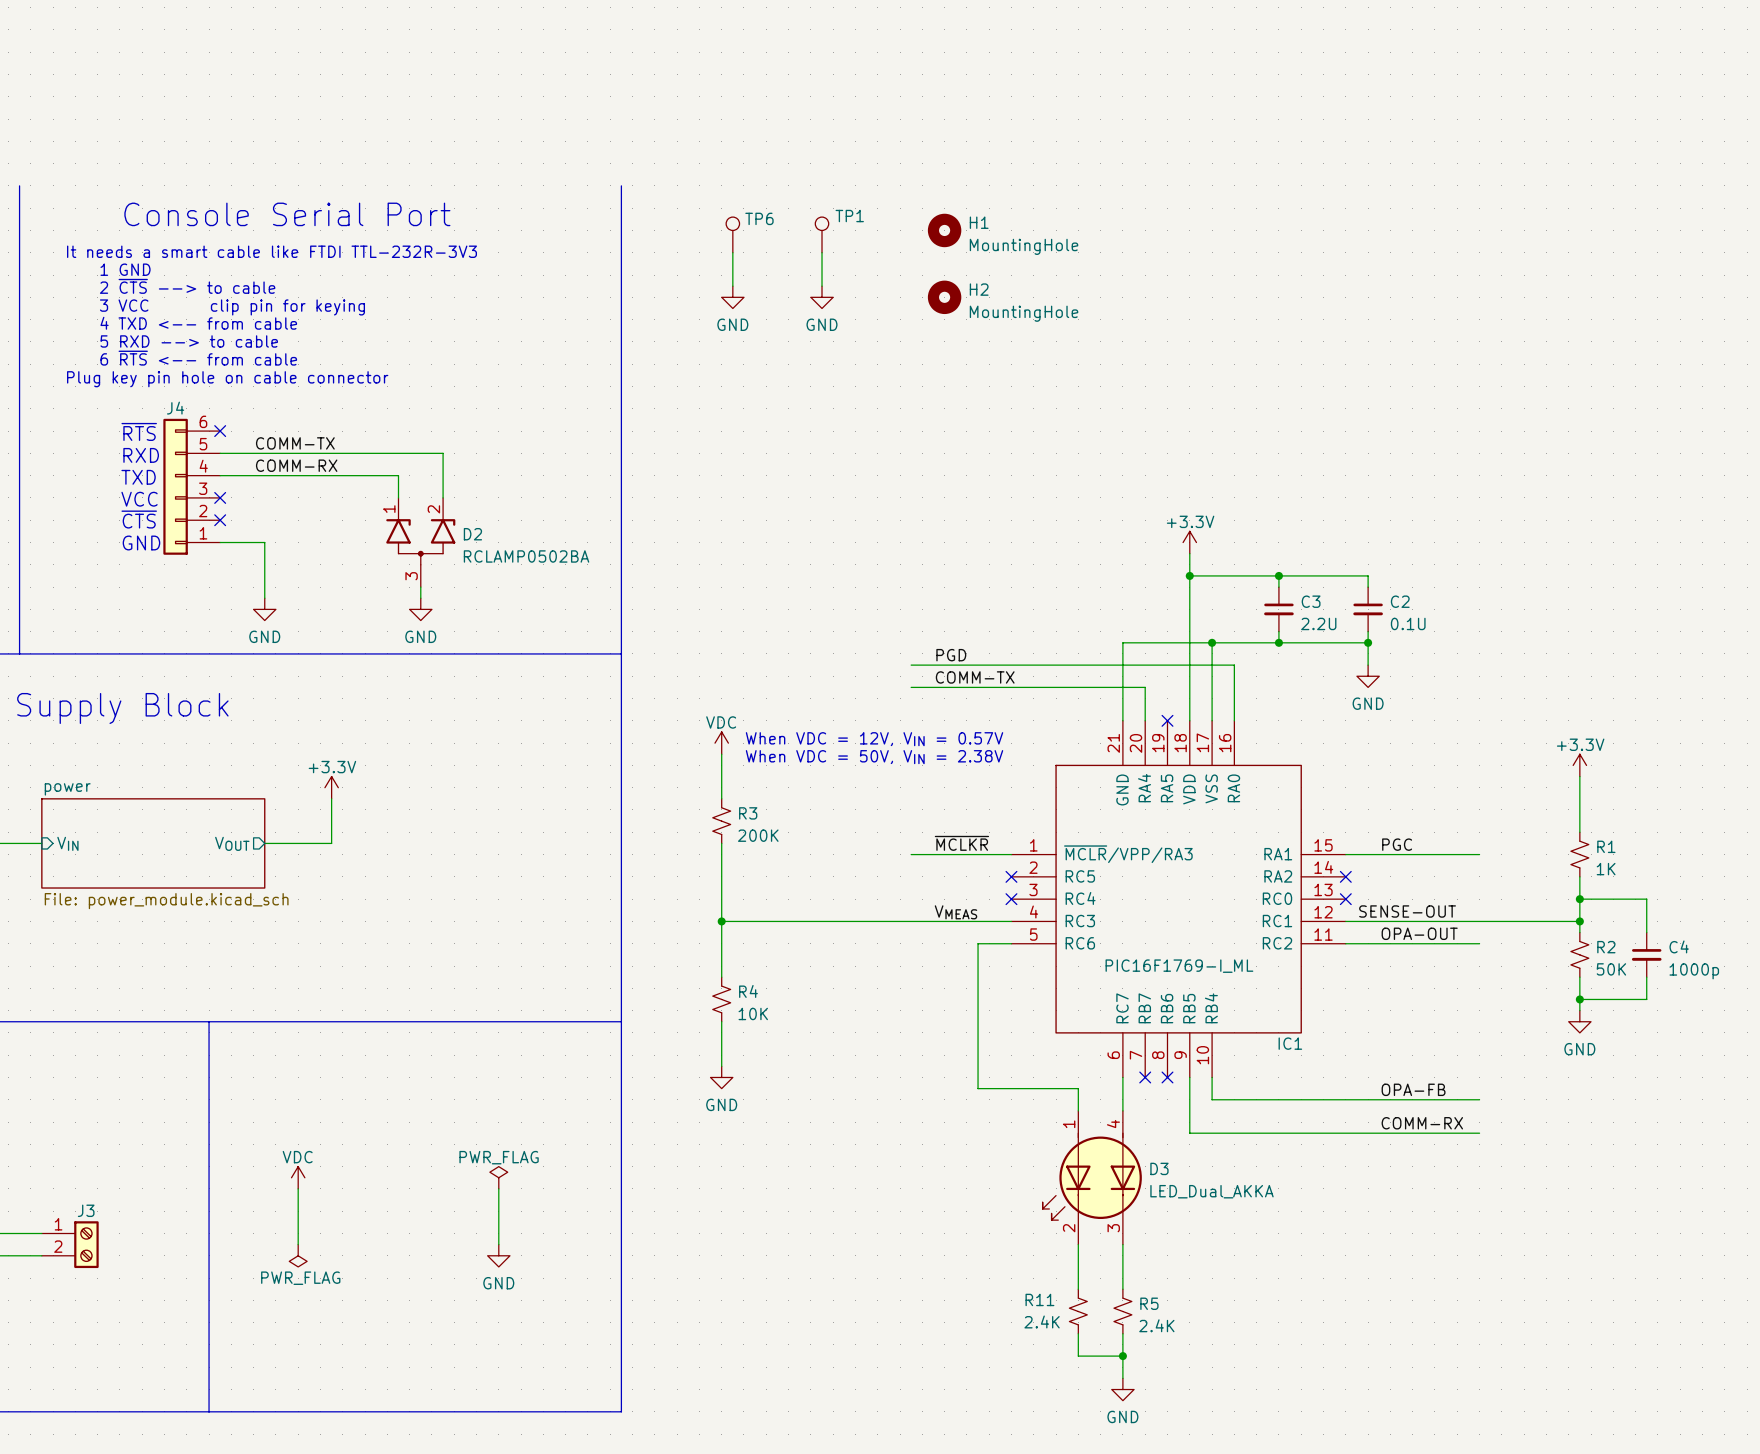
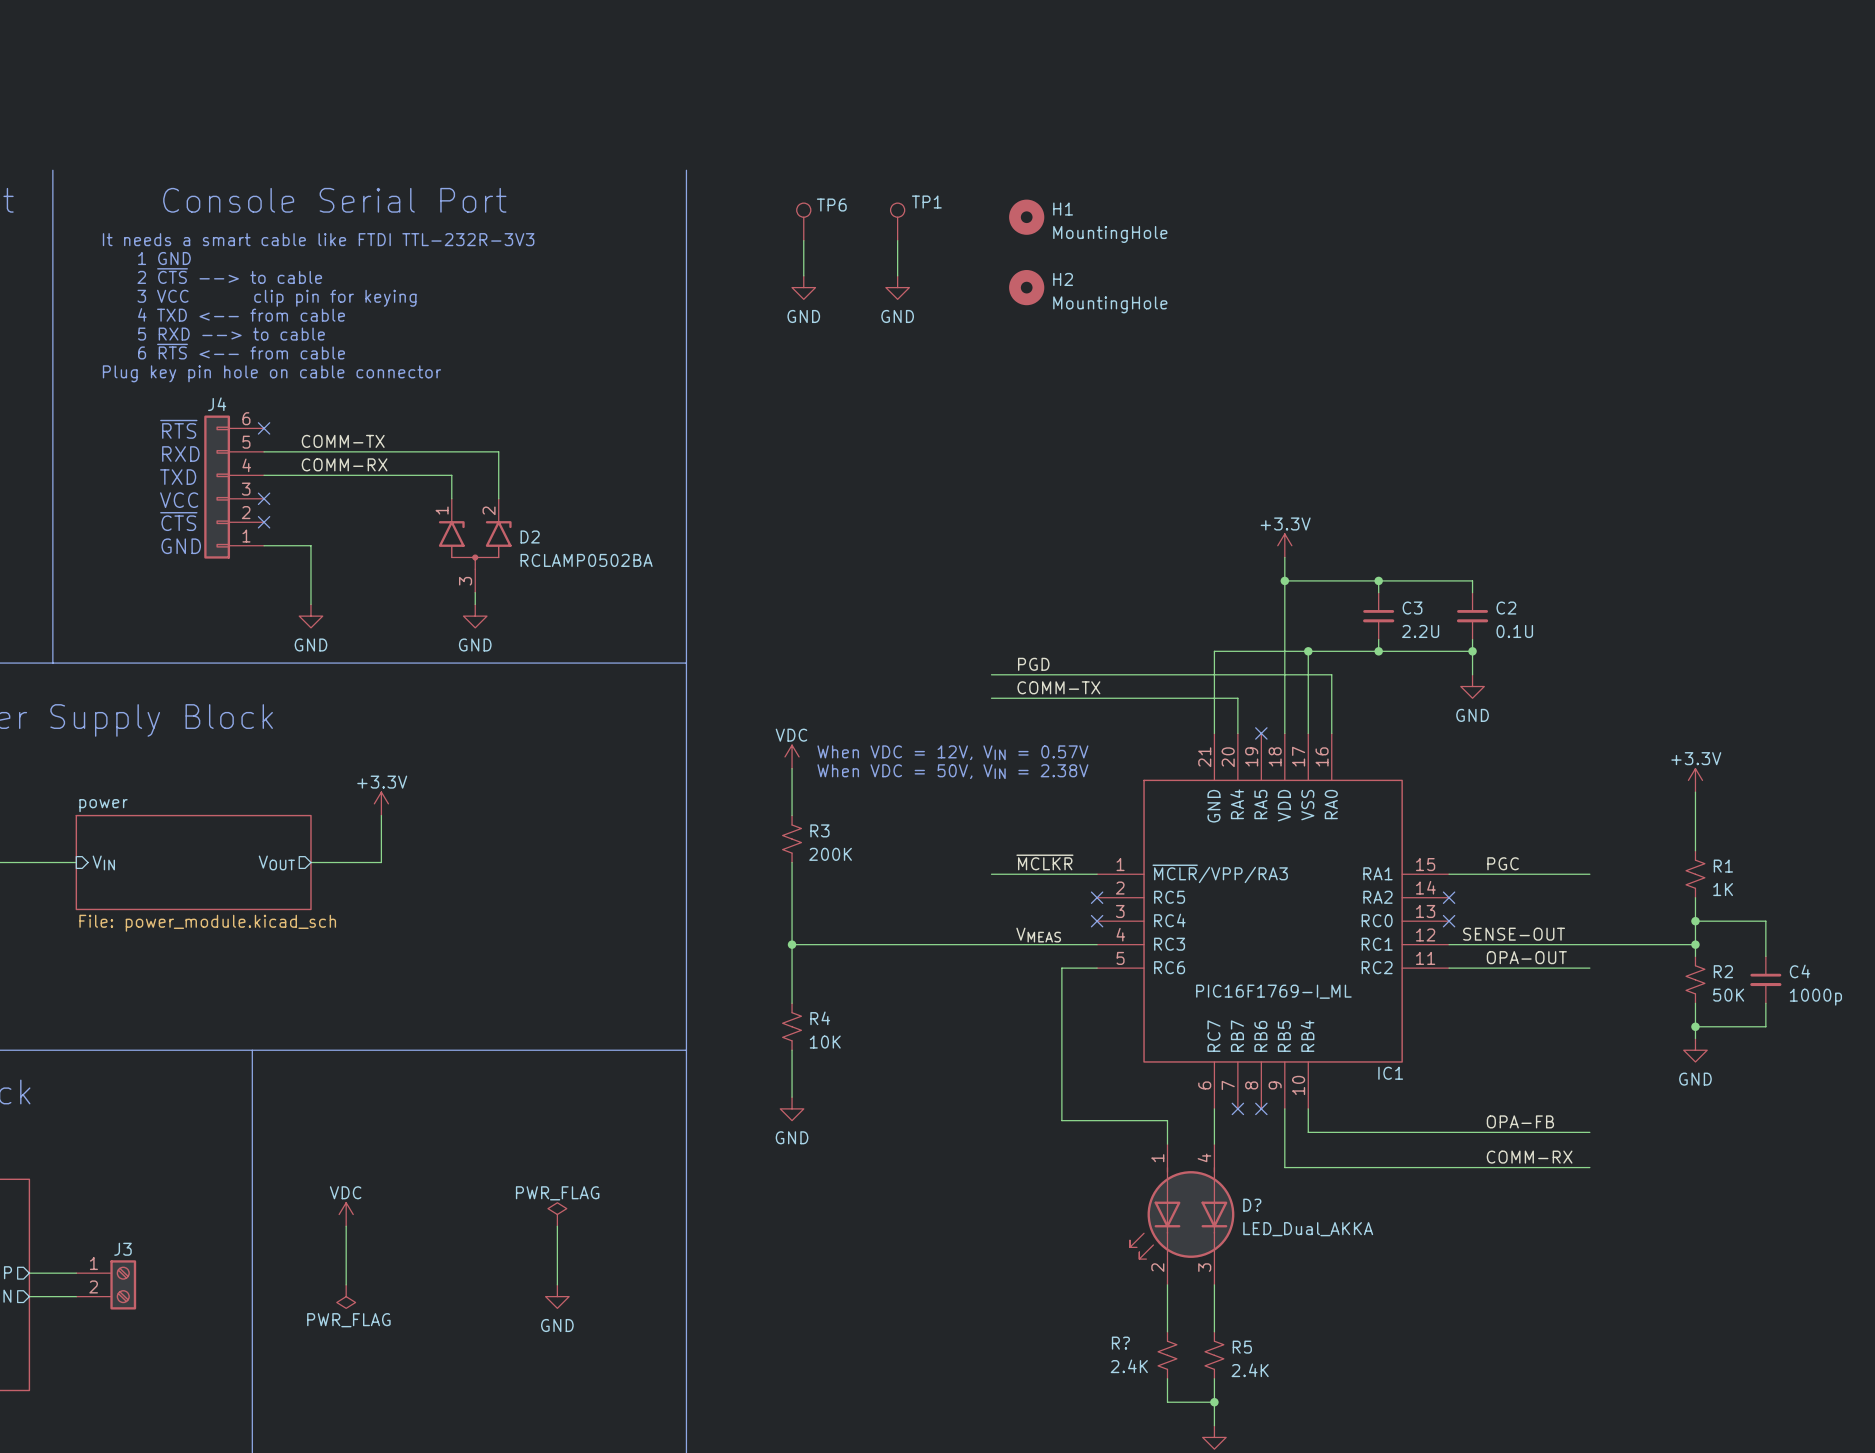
D3 name: D3 (1159, 1168) -> D? (1252, 1205)
R11 name: R11 (1039, 1299) -> R? (1120, 1343)

